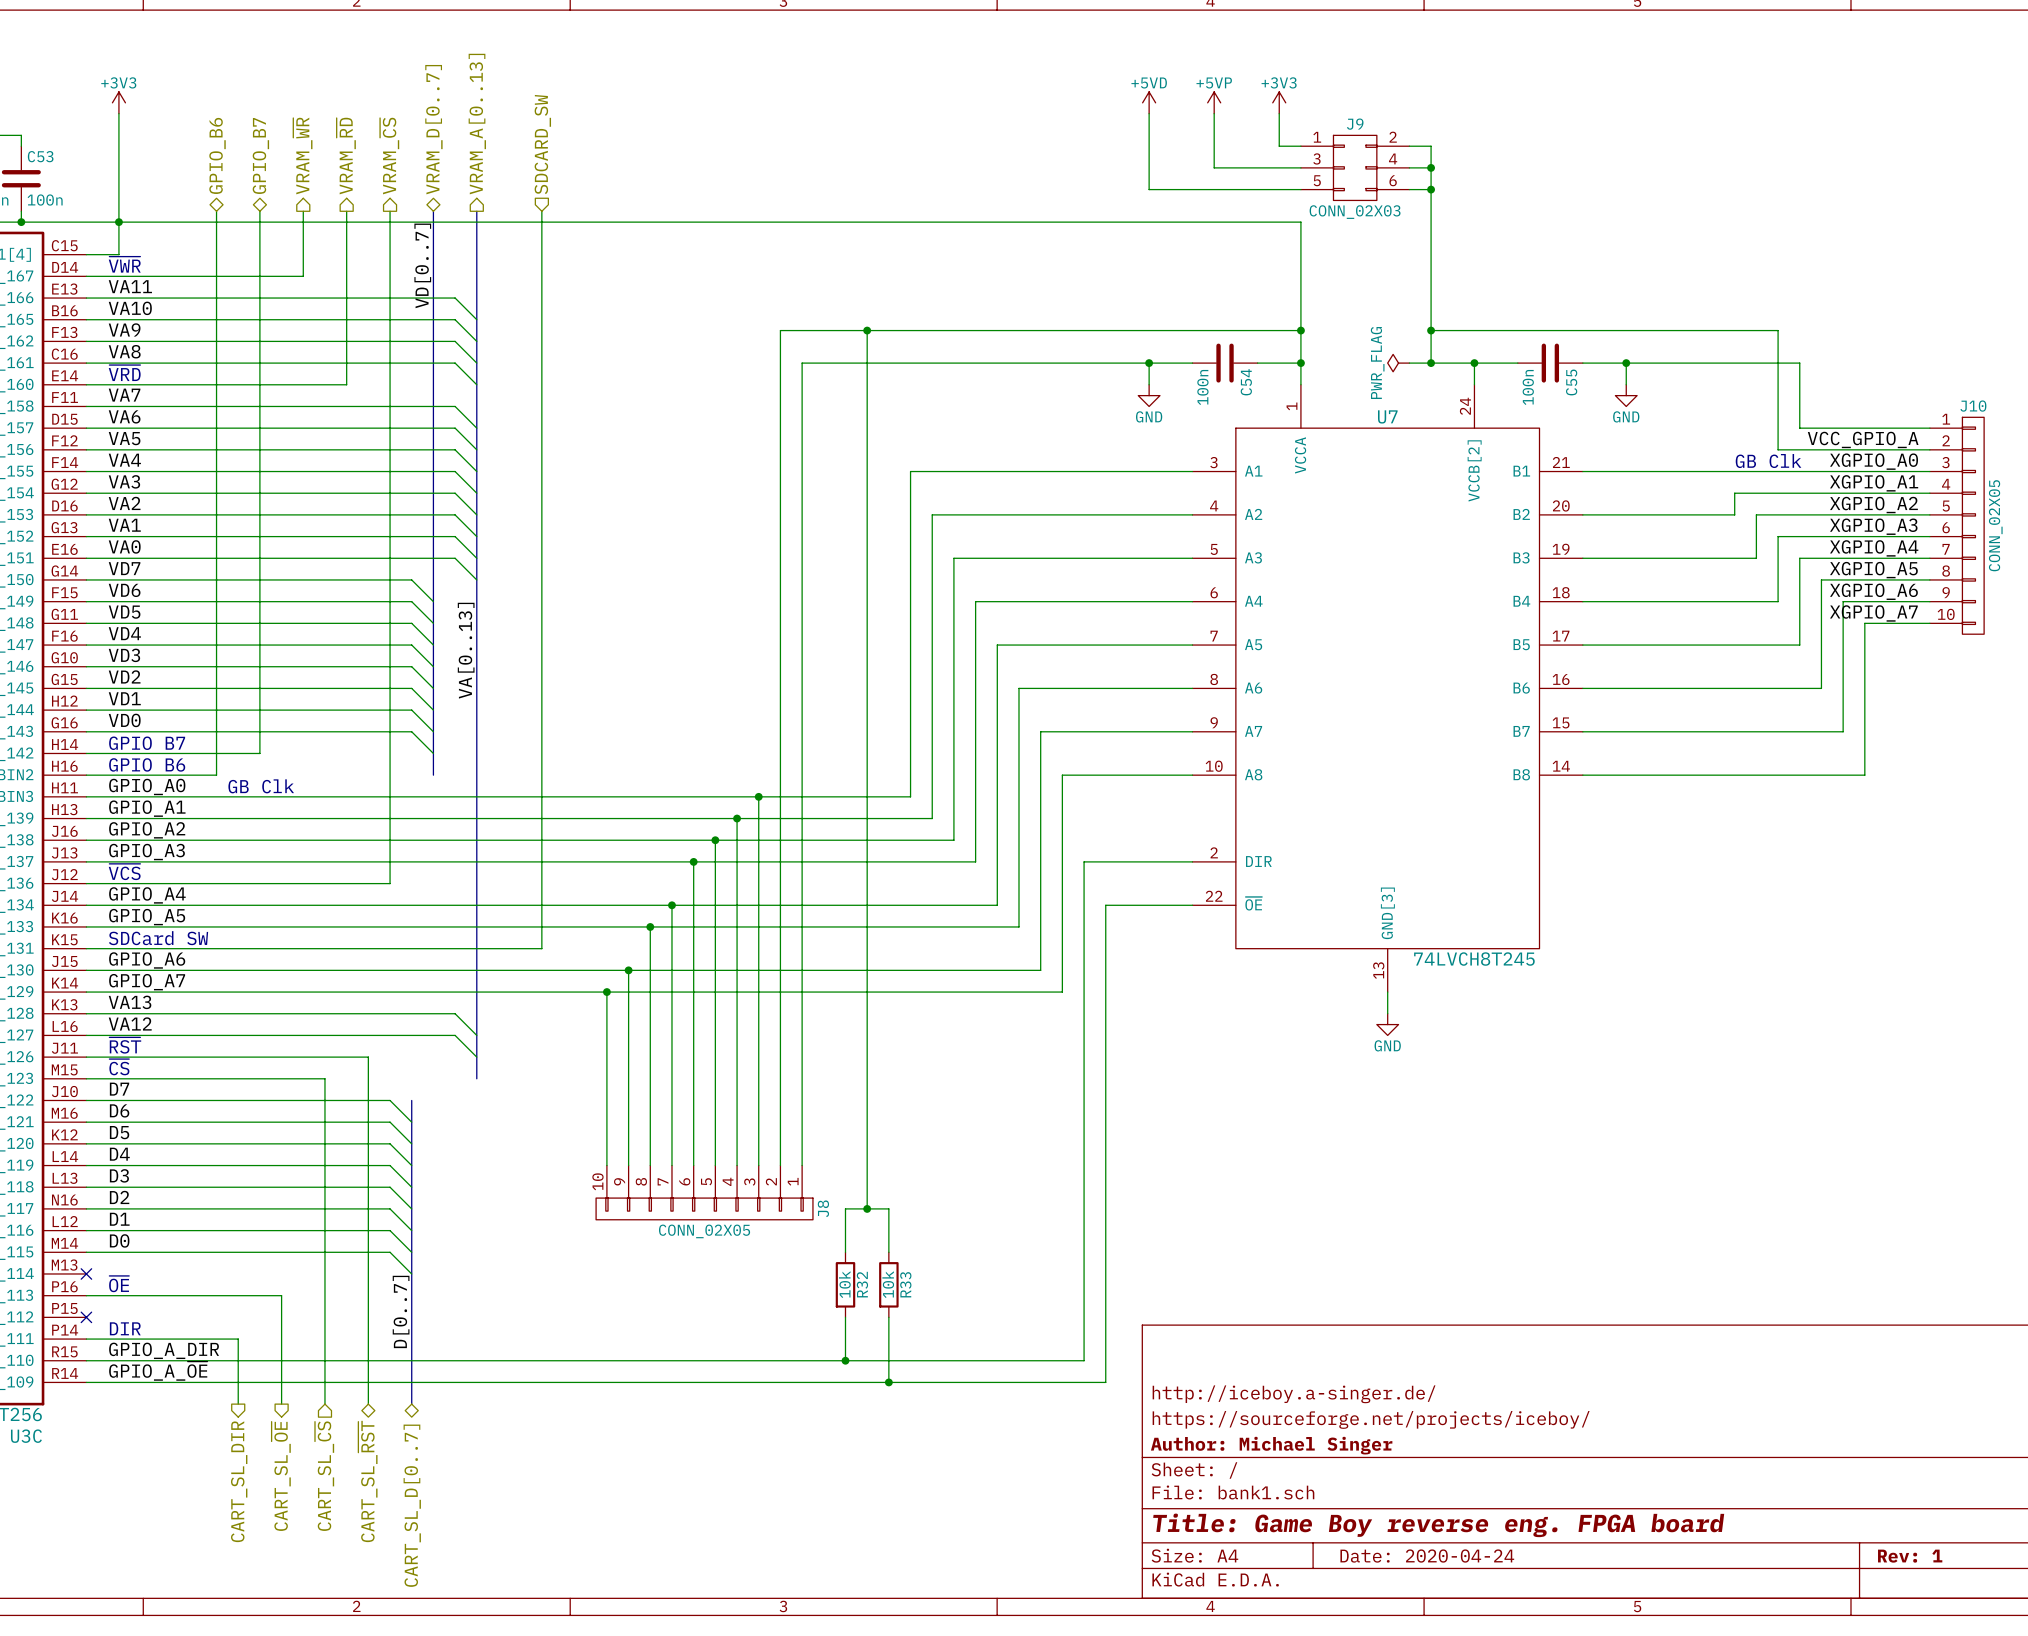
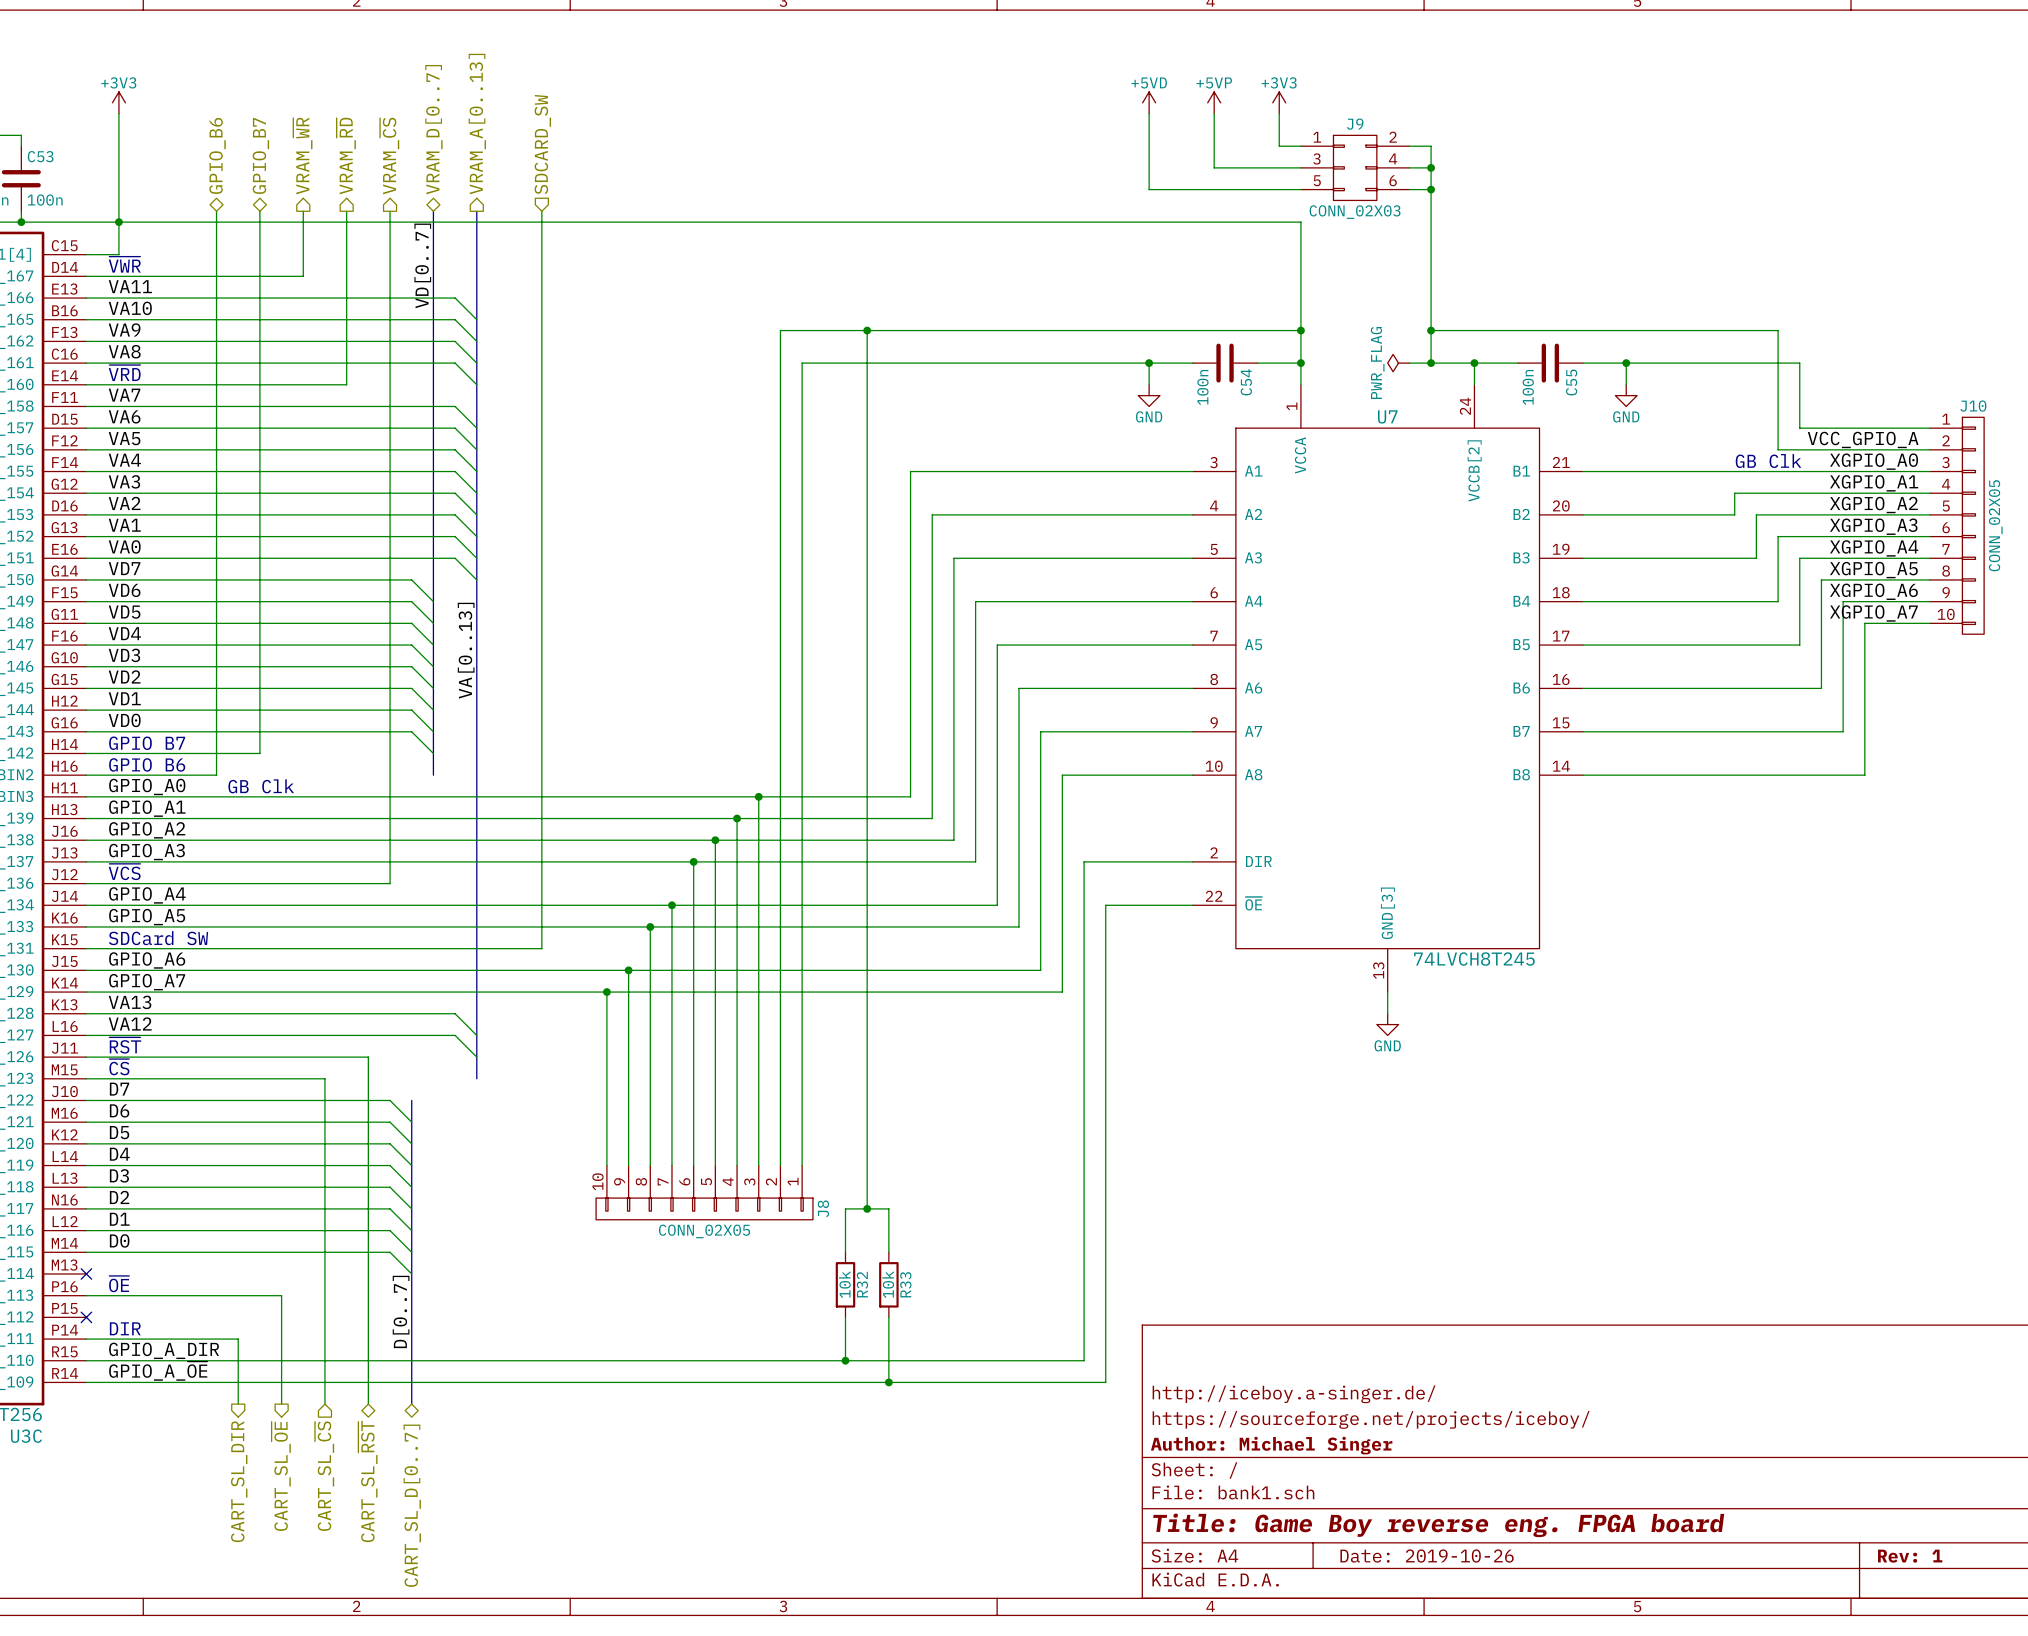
title block: Date: 2020-04-24 (1427, 1556) -> Date: 2019-10-26 (1427, 1556)

